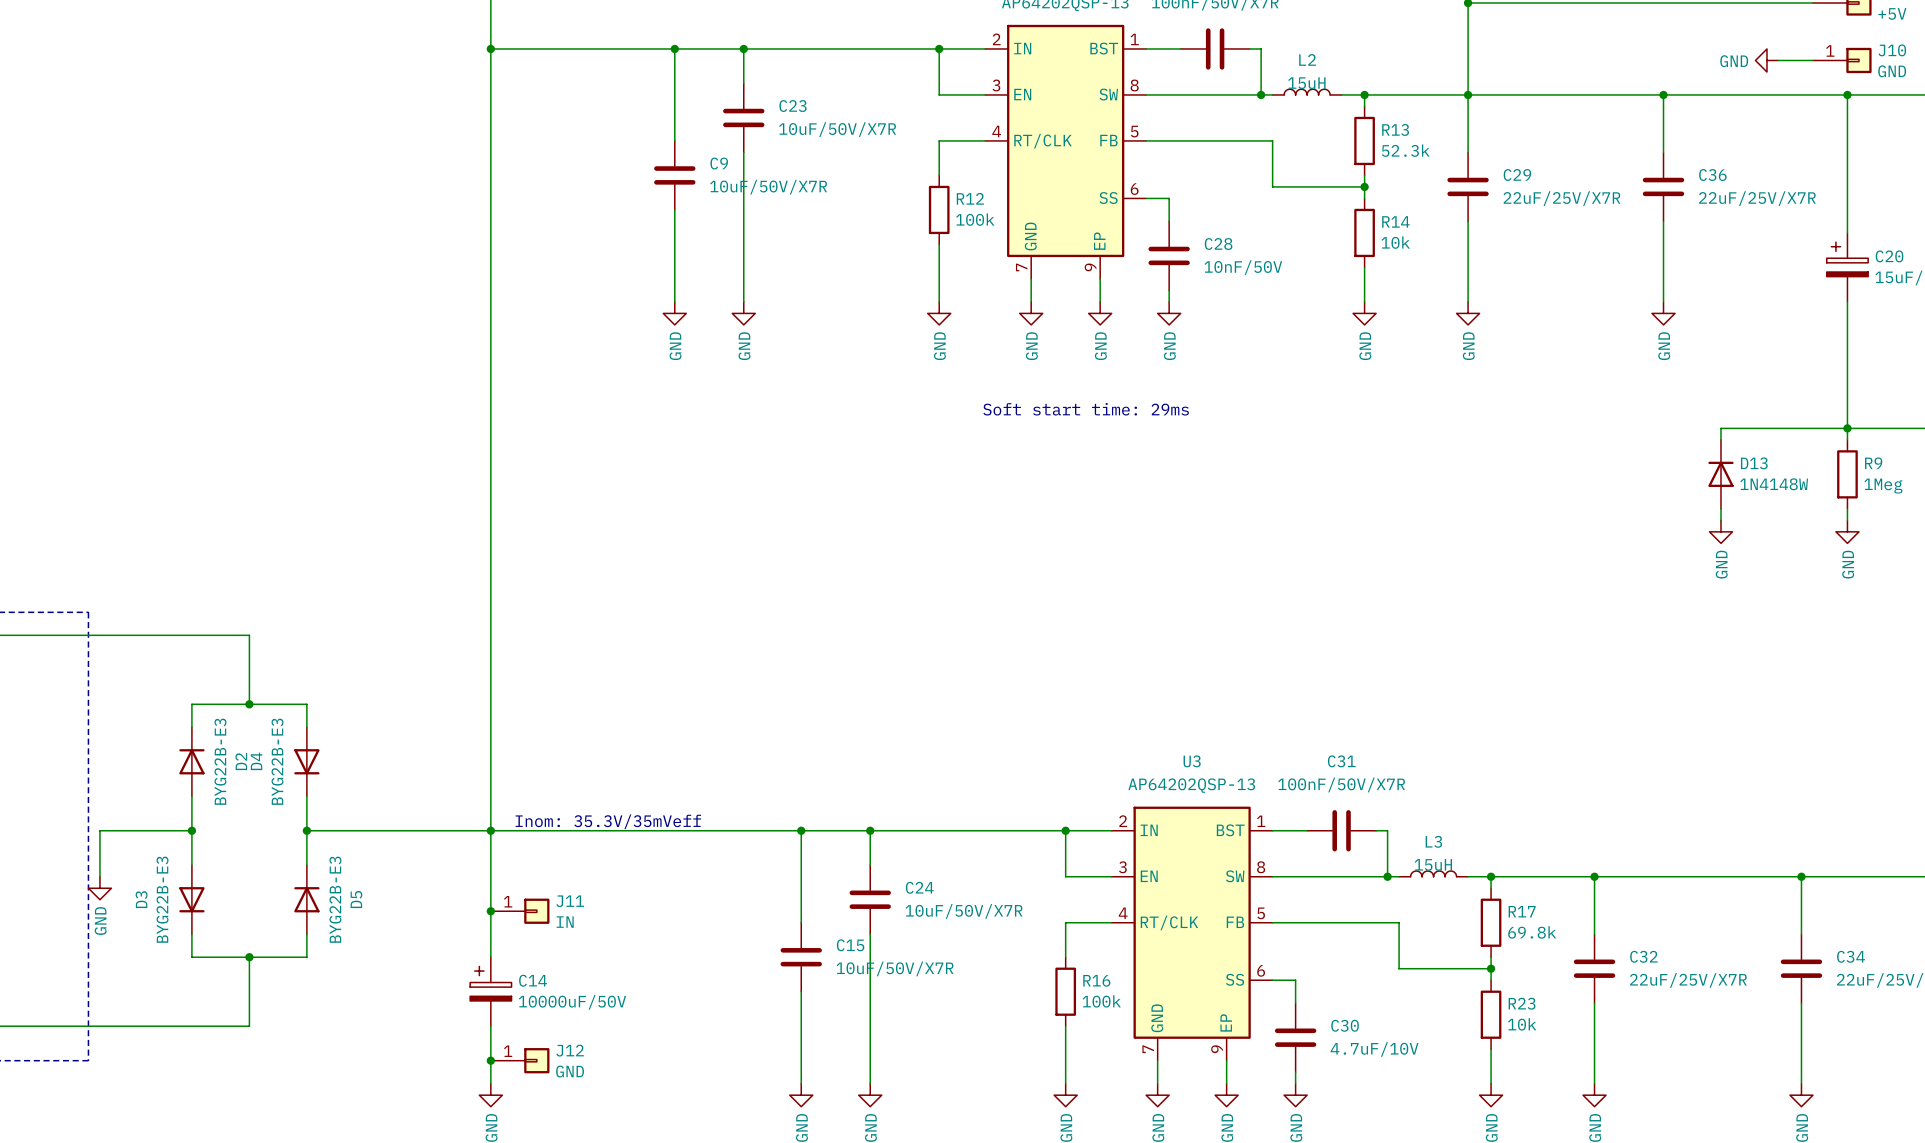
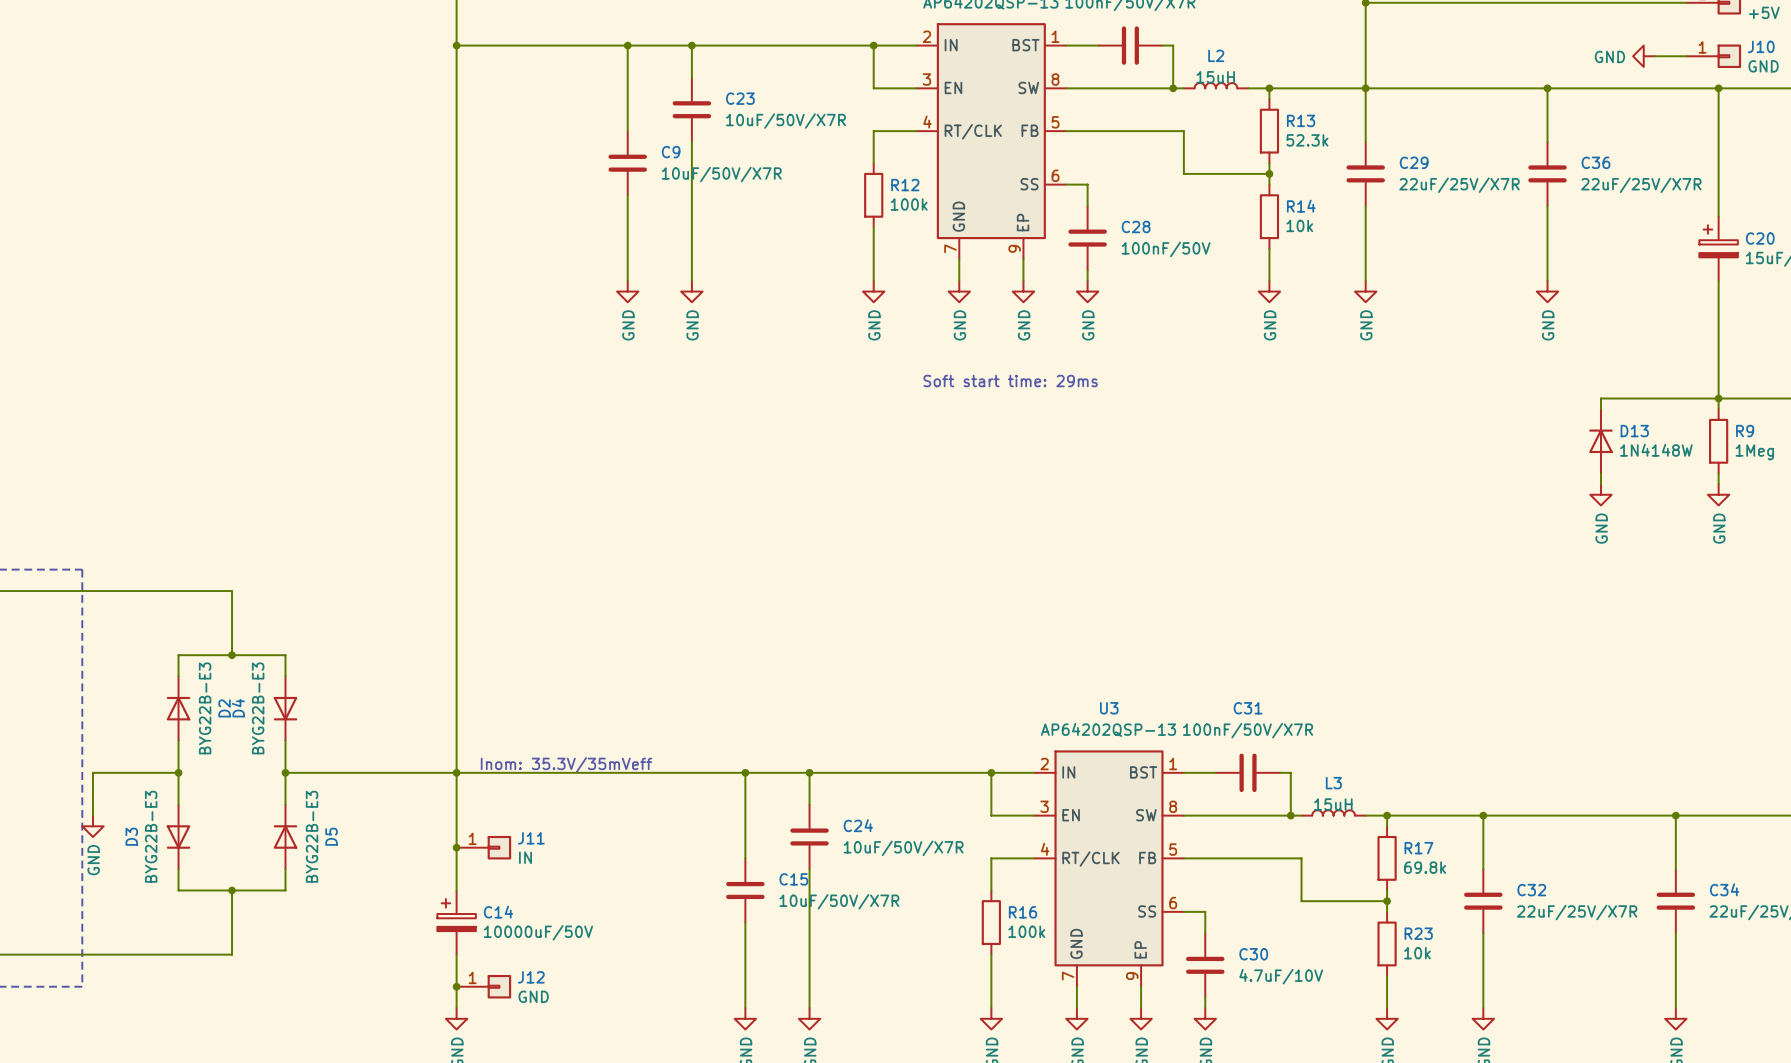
C28 value: 10nF/50V (1243, 267) -> 100nF/50V (1166, 249)

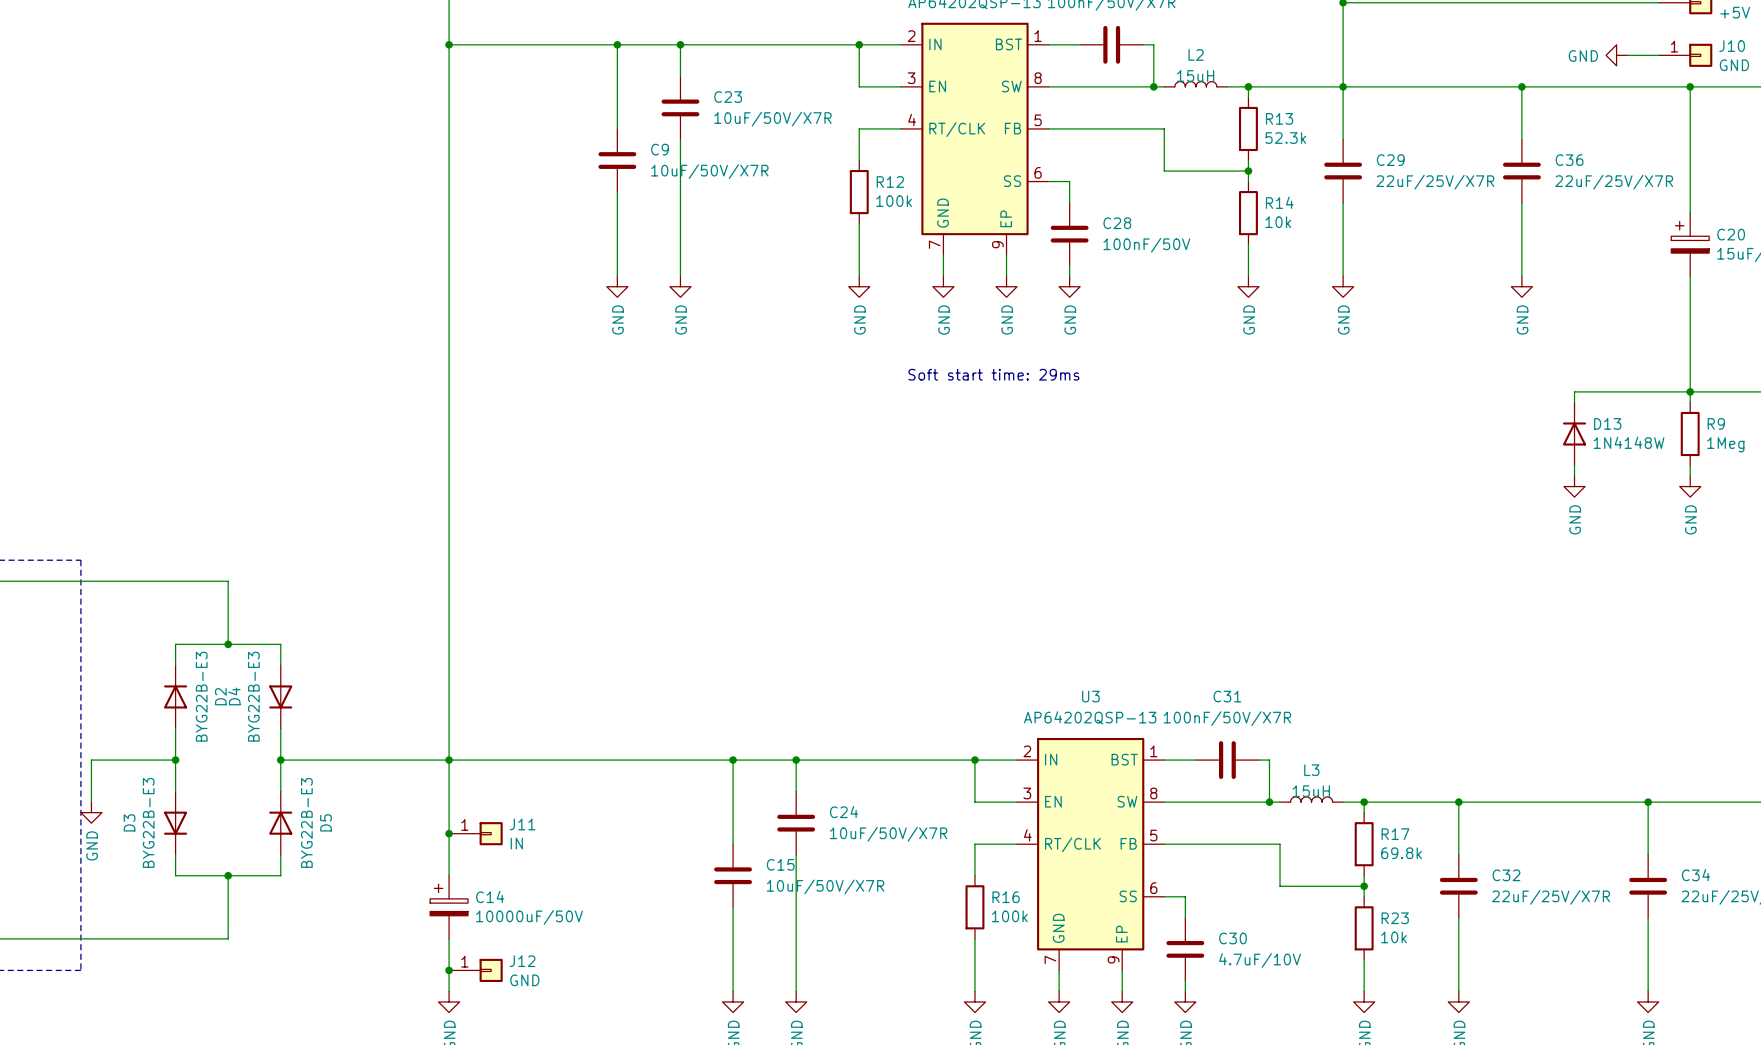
text: Inom: 35.3V/35mVeff (566, 764) -> none

